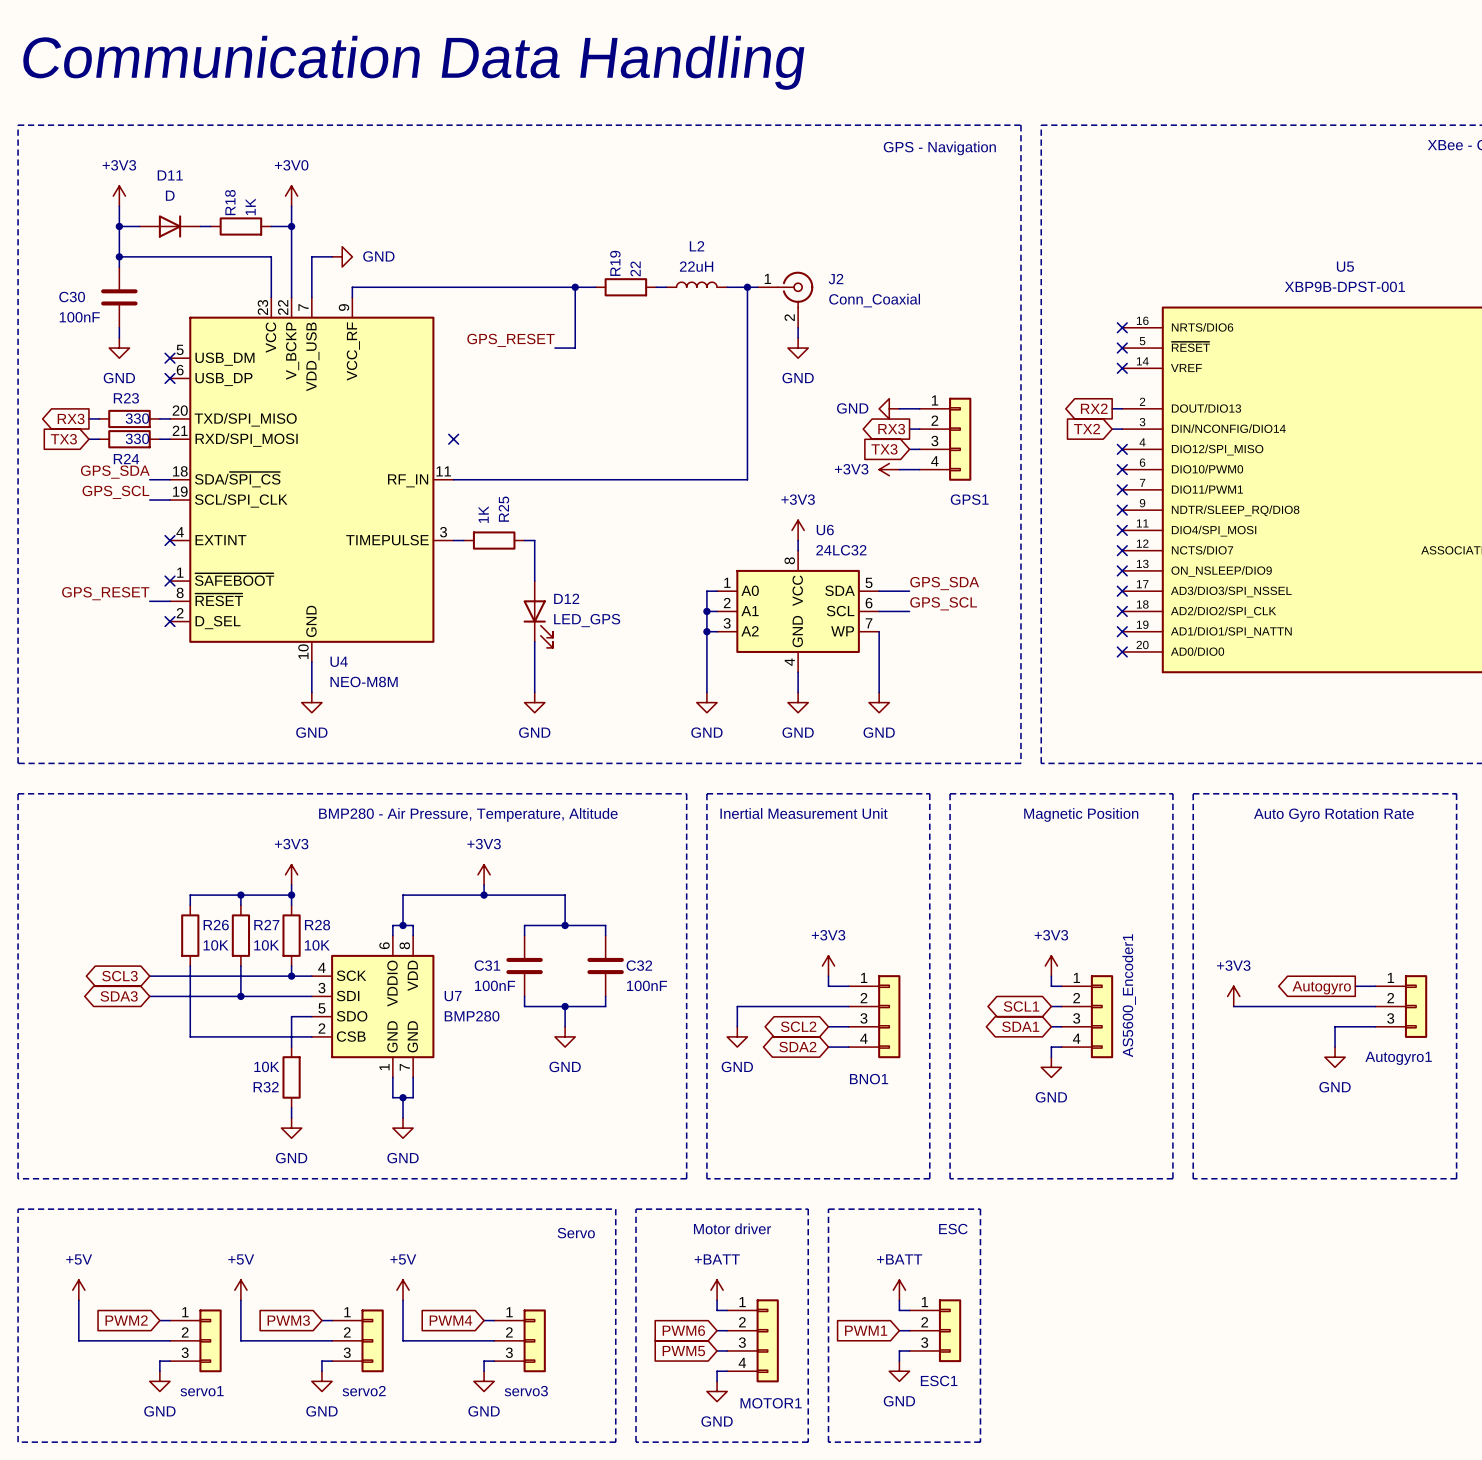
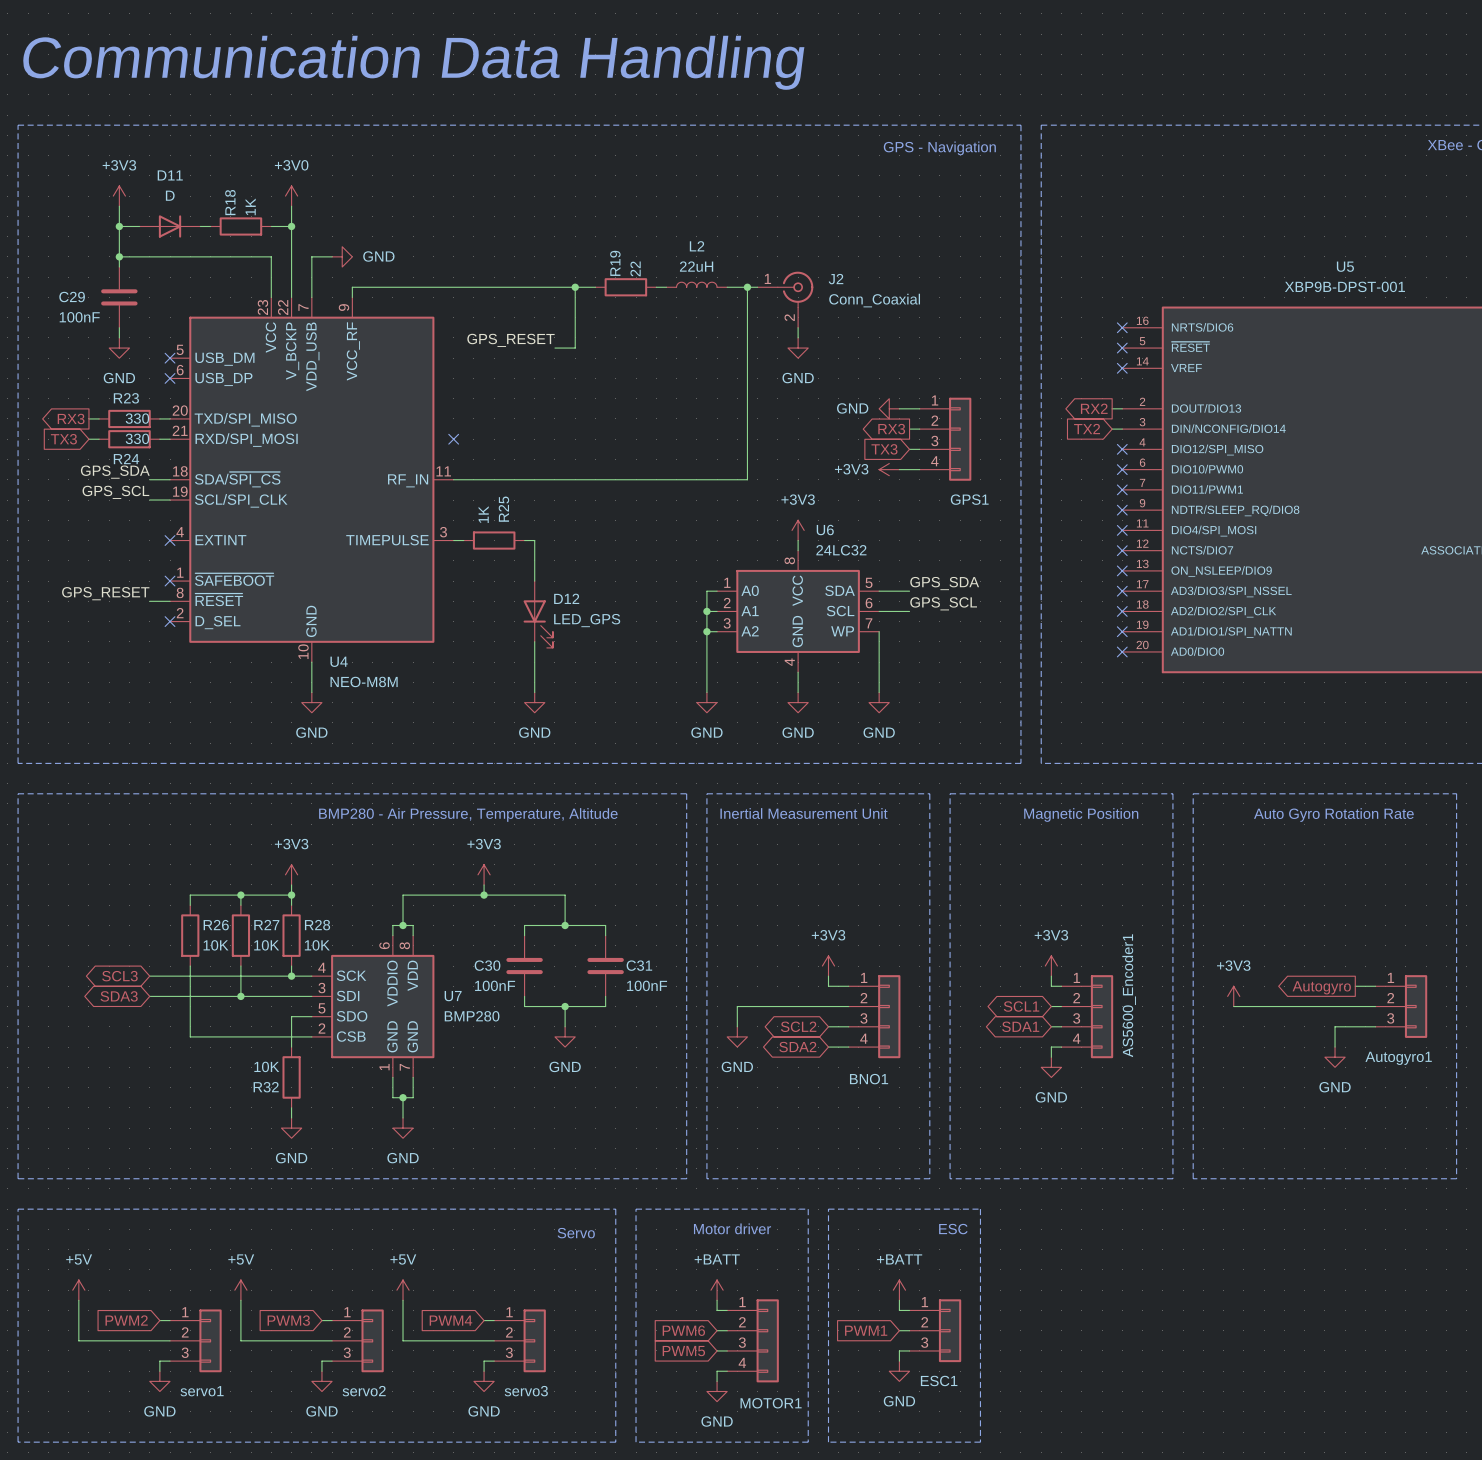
C30 name: C30 (72, 297) -> C29 (72, 297)
C31 name: C31 (487, 965) -> C30 (487, 965)
C32 name: C32 (639, 965) -> C31 (639, 965)

